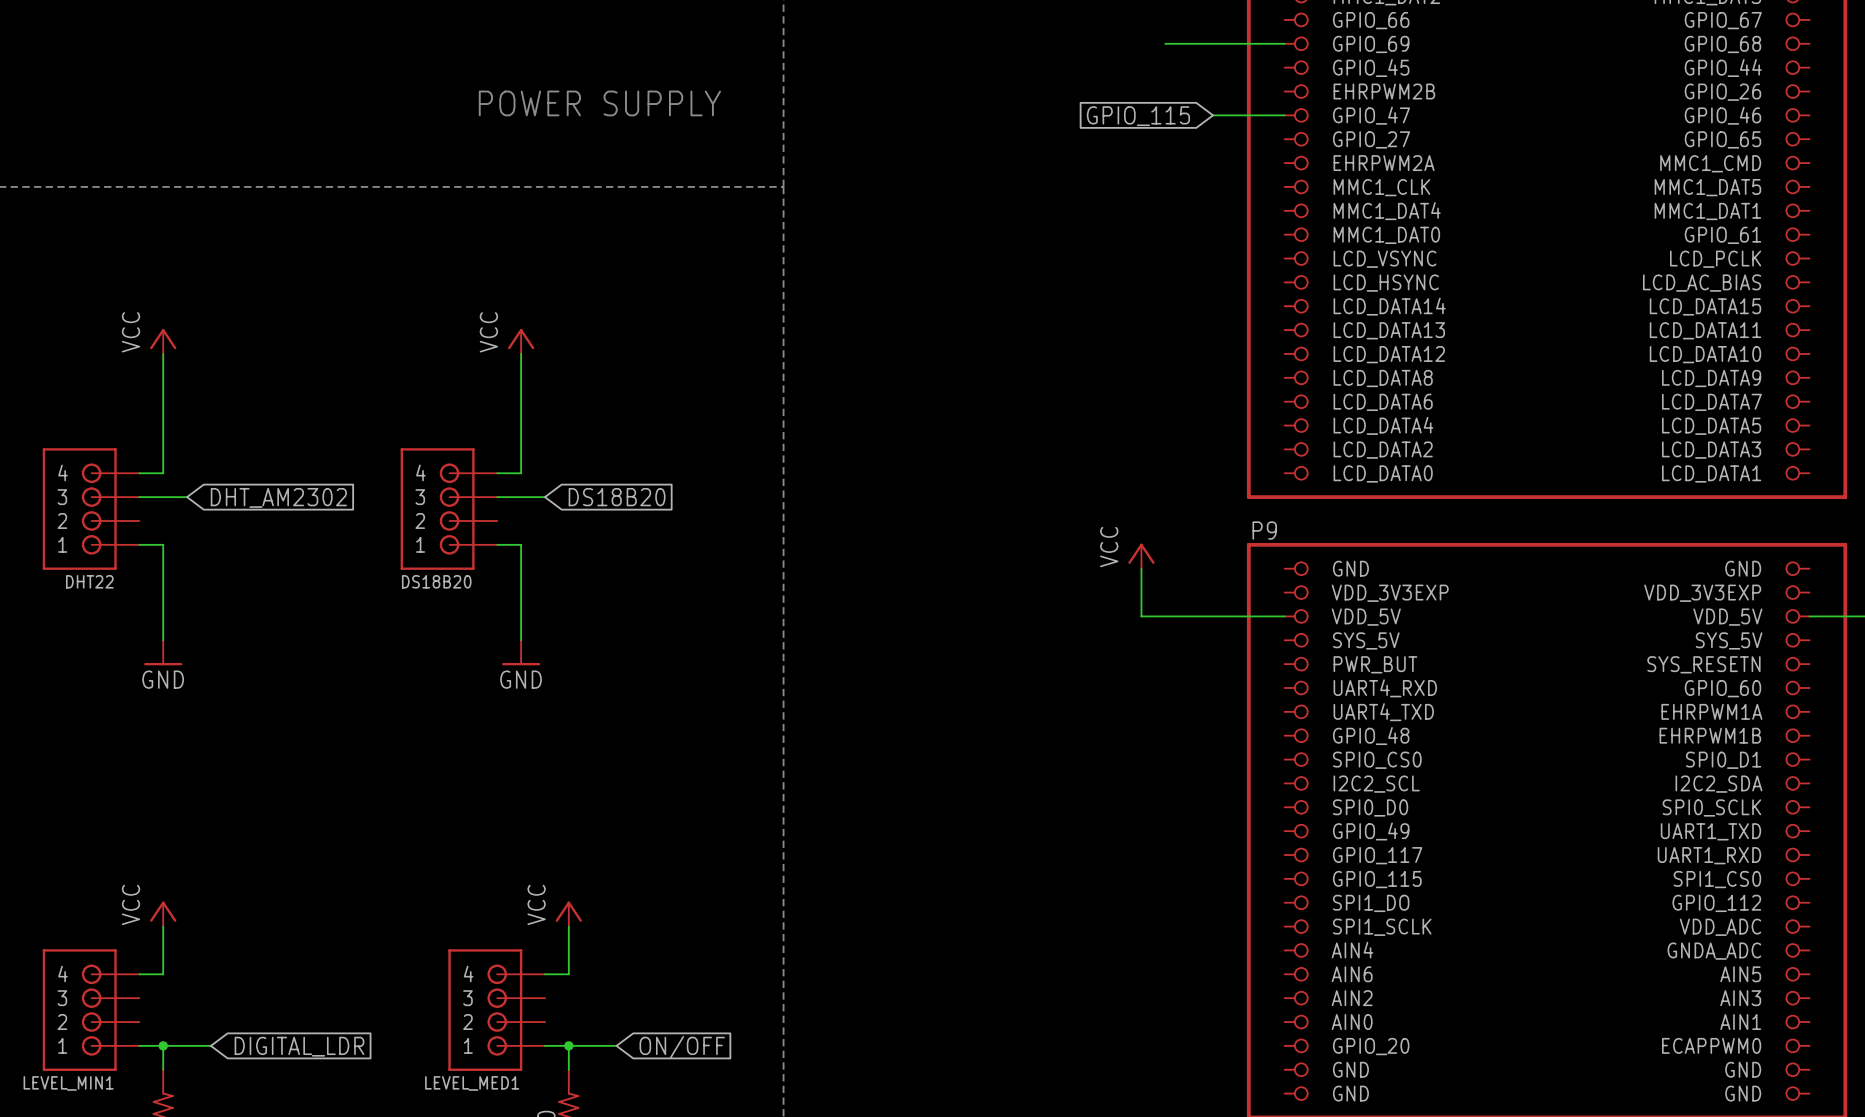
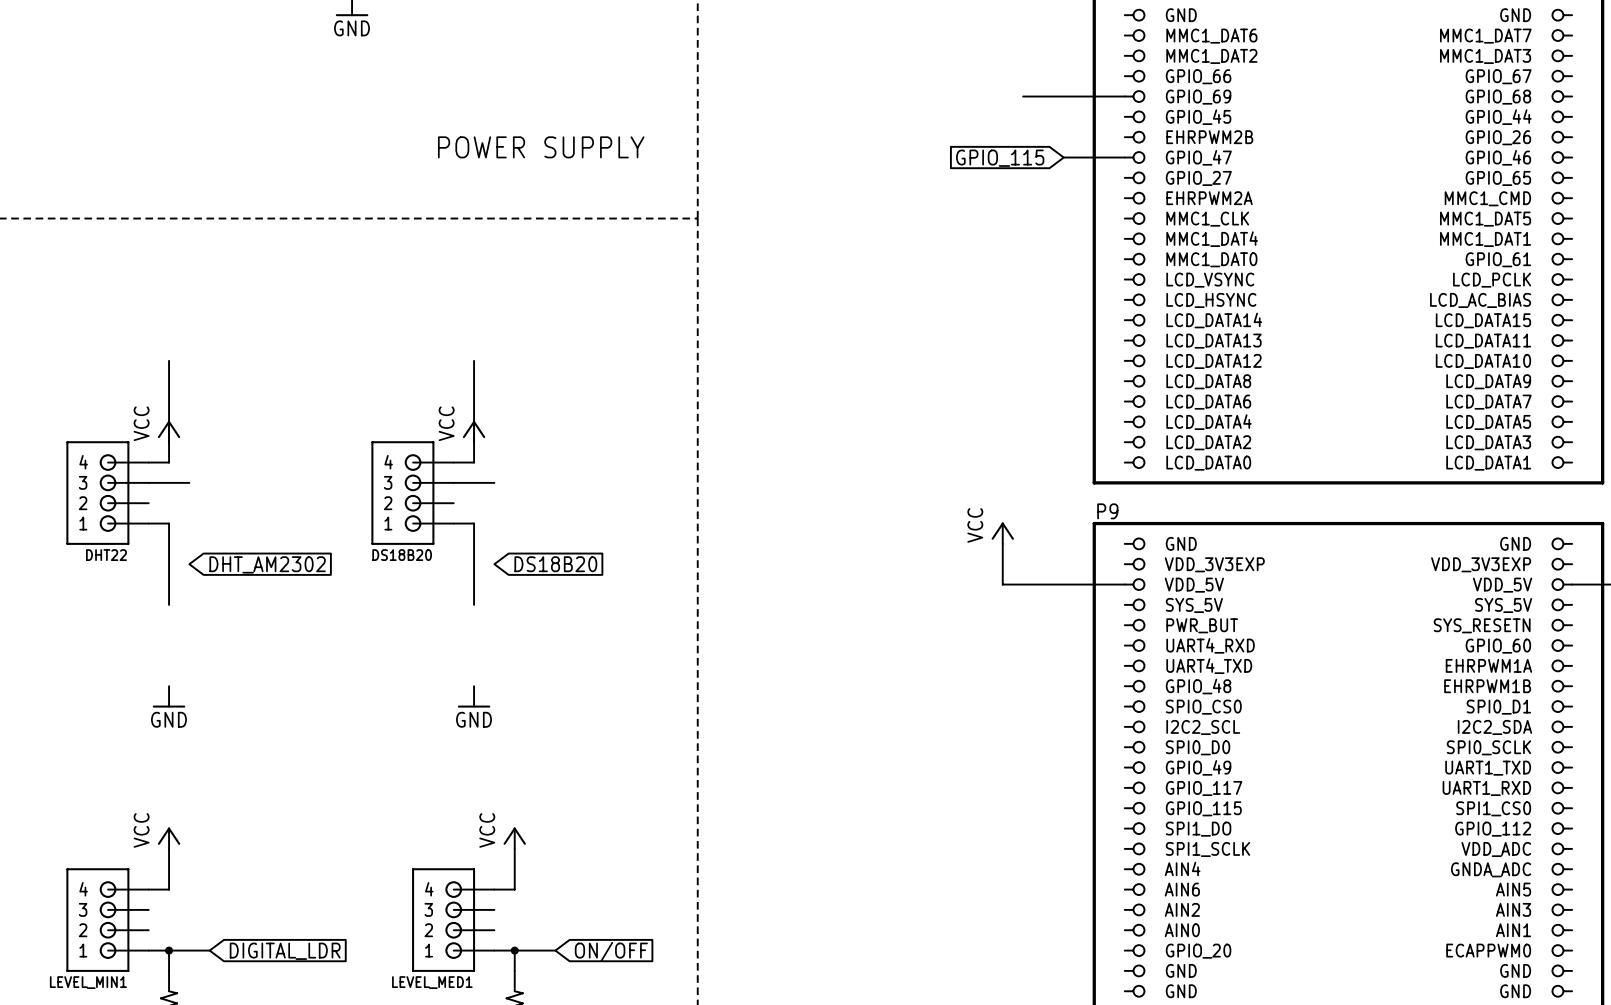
power symbol position: VCC (163, 341) -> VCC (169, 431)
power symbol position: VCC (521, 341) -> VCC (474, 431)
global label position: DHT_AM2302 (278, 497) -> DHT_AM2302 (267, 564)
global label position: DS18B20 (617, 497) -> DS18B20 (555, 564)
power symbol position: GND (163, 652) -> GND (169, 696)
power symbol position: GND (521, 652) -> GND (474, 696)

